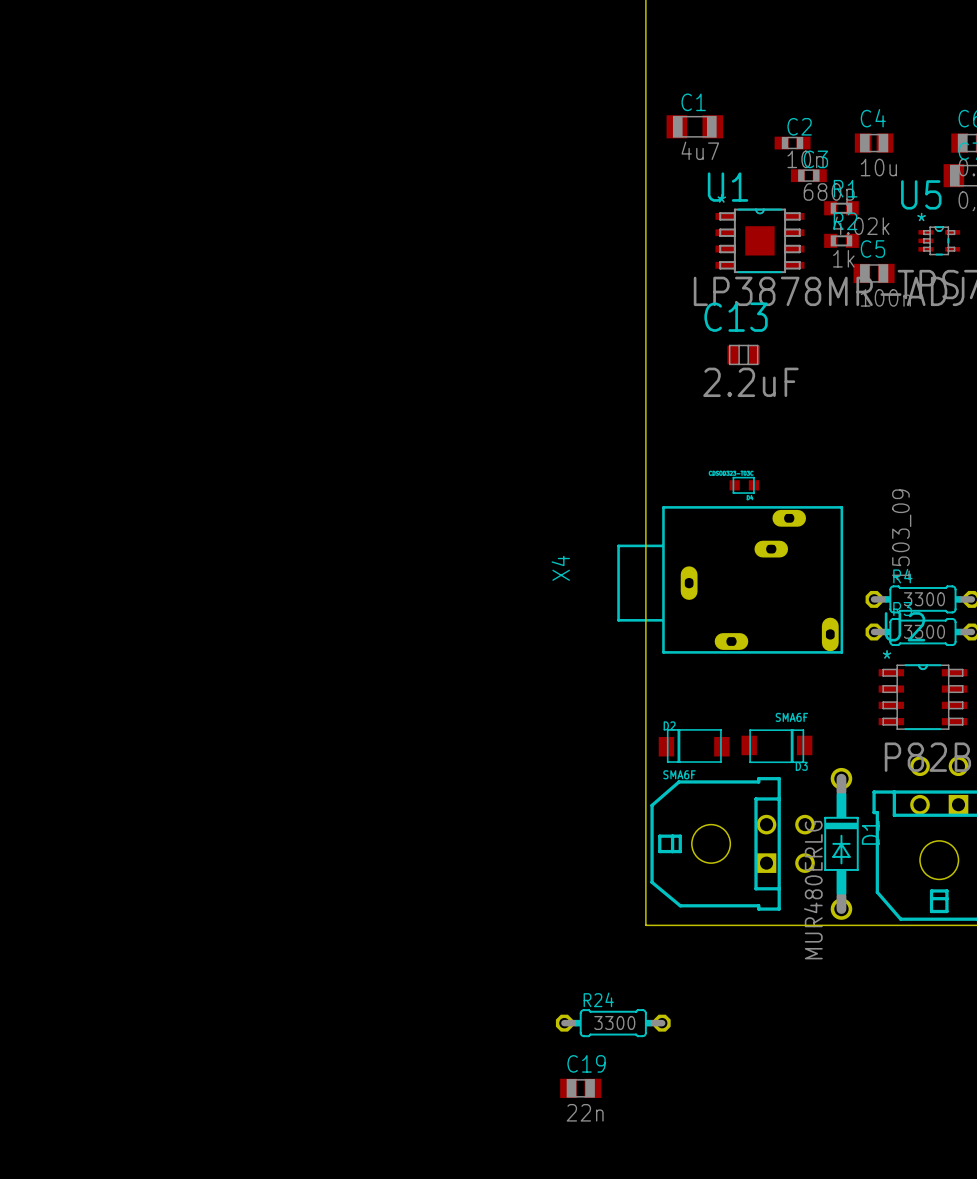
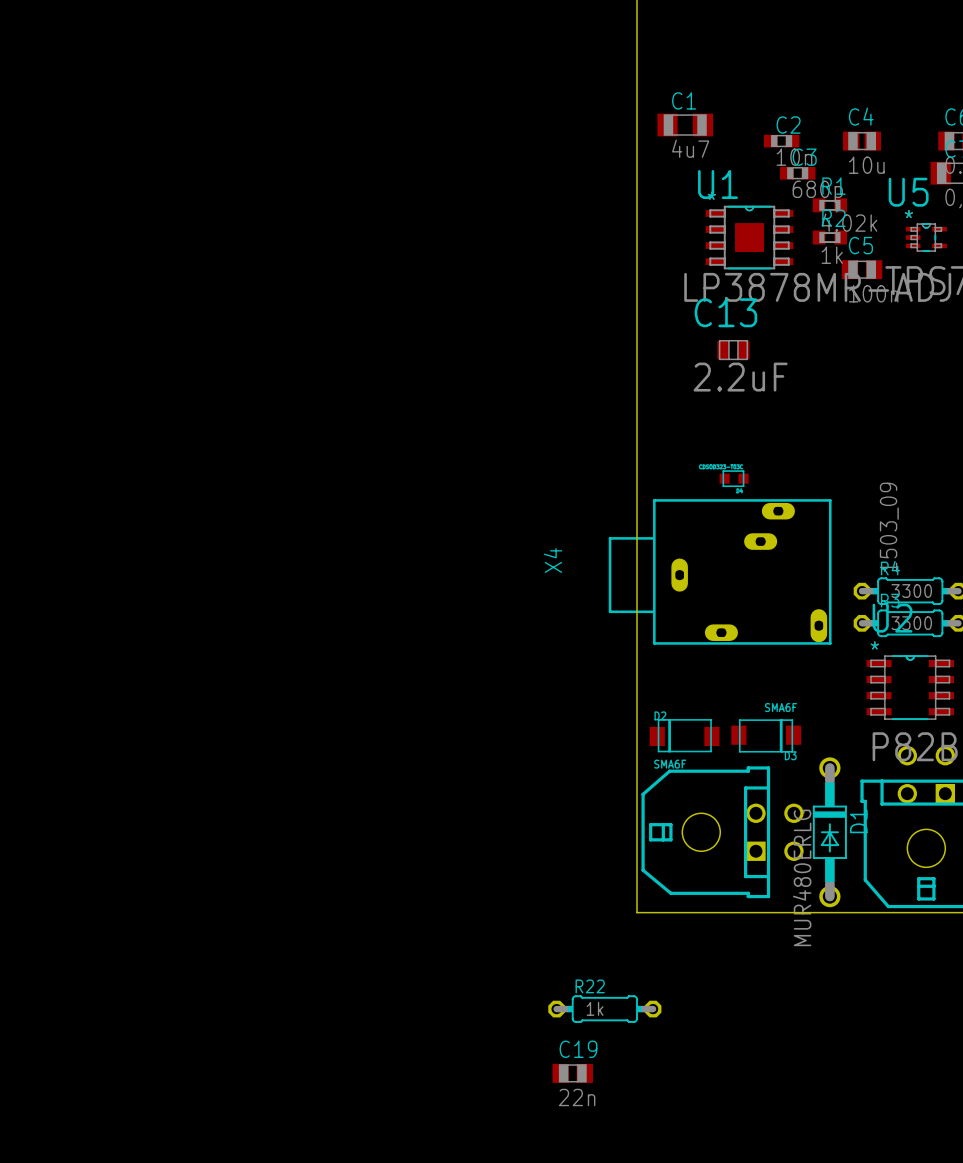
R24 name: R24 (598, 999) -> R22 (590, 986)
R24 value: 3300 (614, 1022) -> 1k (595, 1008)

